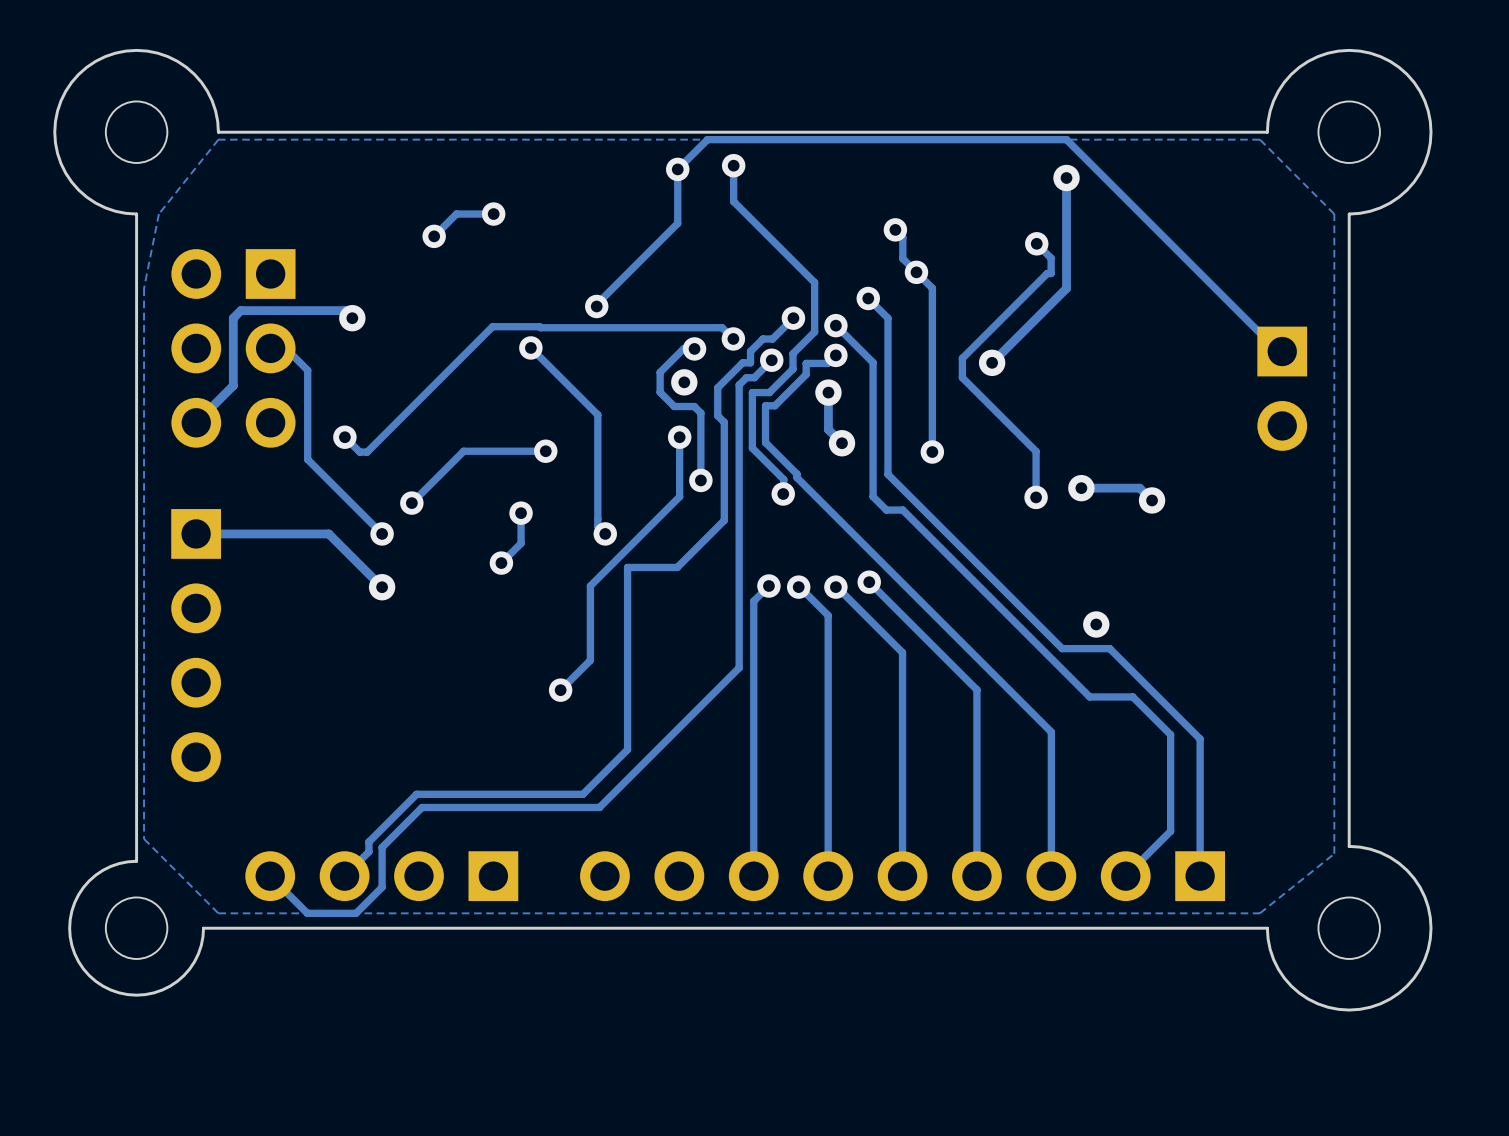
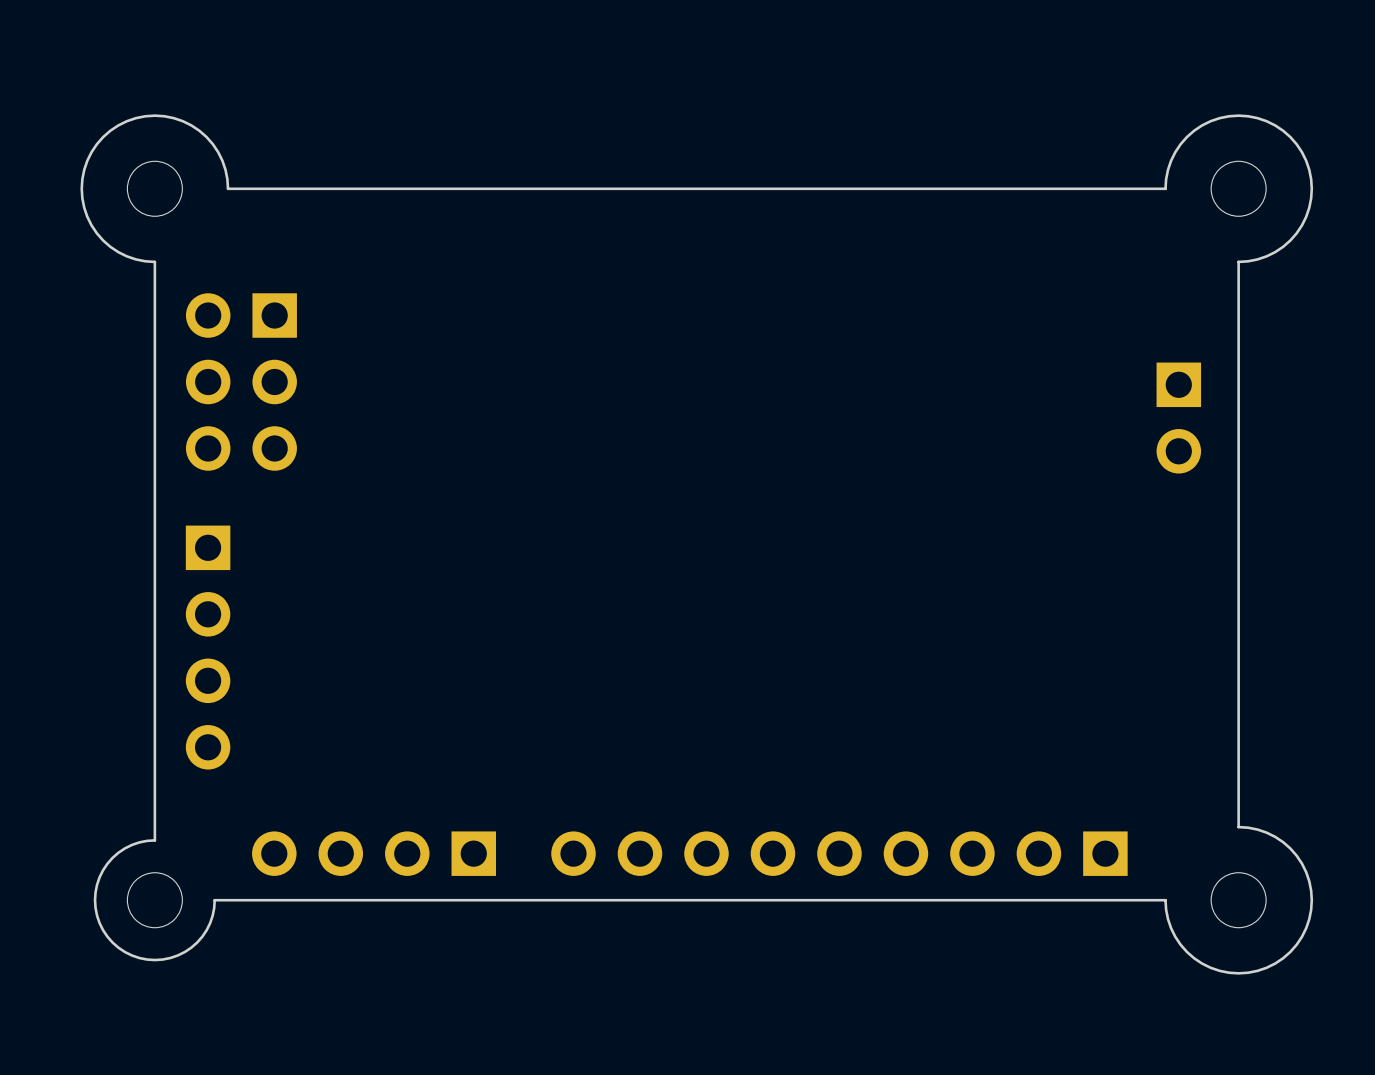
zone outline: (1259, 139) (1334, 214) (1334, 853) (1259, 913) (218, 913) (144, 838) (144, 288) (158, 214) (218, 139) (1259, 139) -> none
track: (733, 165) (733, 201) (814, 282) (814, 331) (792, 353) (792, 369) (769, 392) (752, 392) (752, 448) (783, 479) (783, 494) -> none
via: (733, 165) -> none
via: (677, 169) -> none
track: (1066, 178) (1066, 288) (992, 362) -> none
via: (1066, 178) -> none
track: (493, 214) (456, 214) (434, 236) -> none
via: (493, 214) -> none
track: (895, 229) (902, 237) (902, 258) (932, 288) (932, 452) -> none
via: (895, 229) -> none
via: (434, 236) -> none
track: (1036, 243) (1051, 258) (1051, 273) (1047, 273) (962, 358) (962, 377) (1036, 451) (1036, 497) -> none
via: (1036, 243) -> none
via: (916, 272) -> none
track: (868, 298) (887, 318) (887, 474) (1062, 648) (1109, 648) (1200, 739) (1200, 876) -> none
via: (868, 298) -> none
track: (596, 306) (597, 307) (597, 303) (677, 223) (677, 169) (707, 139) (1066, 139) (1278, 351) (1282, 351) -> none
via: (596, 306) -> none
track: (352, 318) (344, 310) (240, 310) (233, 318) (233, 385) (196, 422) -> none
via: (352, 318) -> none
track: (793, 318) (772, 339) (762, 339) (750, 351) (750, 362) (742, 362) (717, 387) (717, 415) (724, 422) (724, 520) (677, 567) (627, 567) (627, 749) (582, 794) (416, 794) (368, 841) (368, 851) (344, 876) (329, 876) -> none
via: (793, 318) -> none
via: (835, 325) -> none
track: (836, 325) (873, 362) (873, 496) (886, 510) (902, 510) (1089, 696) (1132, 696) (1170, 734) (1170, 831) (1125, 876) -> none
track: (733, 338) (722, 327) (492, 326) (367, 452) (359, 452) (344, 437) -> none
via: (733, 338) -> none
track: (530, 347) (597, 414) (597, 526) (605, 533) -> none
via: (530, 347) -> none
track: (270, 348) (285, 348) (307, 370) (307, 459) (382, 533) -> none
track: (694, 348) (683, 348) (660, 372) (660, 392) (674, 406) (694, 406) (700, 413) (700, 480) -> none
via: (694, 348) -> none
track: (835, 355) (827, 363) (806, 363) (806, 374) (774, 405) (765, 405) (765, 442) (796, 474) (796, 477) (1051, 732) (1051, 876) -> none
via: (835, 355) -> none
track: (771, 360) (754, 377) (746, 377) (739, 385) (739, 667) (599, 807) (422, 807) (382, 847) (382, 887) (356, 913) (307, 913) (270, 876) -> none
via: (771, 360) -> none
via: (992, 362) -> none
via: (684, 382) -> none
track: (828, 392) (828, 429) (841, 443) -> none
via: (828, 392) -> none
via: (344, 437) -> none
track: (679, 437) (679, 496) (590, 586) (590, 660) (560, 690) -> none
via: (679, 437) -> none
via: (841, 443) -> none
track: (545, 451) (463, 451) (411, 503) -> none
via: (545, 451) -> none
via: (932, 452) -> none
via: (700, 480) -> none
track: (1081, 488) (1139, 488) (1152, 500) -> none
via: (1081, 488) -> none
via: (783, 494) -> none
via: (1036, 497) -> none
via: (1152, 500) -> none
via: (411, 503) -> none
track: (521, 513) (521, 543) (501, 563) -> none
via: (521, 513) -> none
track: (196, 533) (328, 533) (382, 587) -> none
via: (382, 533) -> none
via: (605, 533) -> none
via: (501, 563) -> none
track: (869, 582) (976, 689) (976, 876) -> none
via: (869, 582) -> none
track: (768, 586) (753, 601) (753, 876) -> none
via: (768, 586) -> none
via: (382, 587) -> none
track: (798, 587) (828, 615) (828, 876) -> none
via: (798, 587) -> none
track: (835, 587) (902, 652) (902, 876) -> none
via: (835, 587) -> none
via: (1096, 624) -> none
via: (560, 690) -> none

